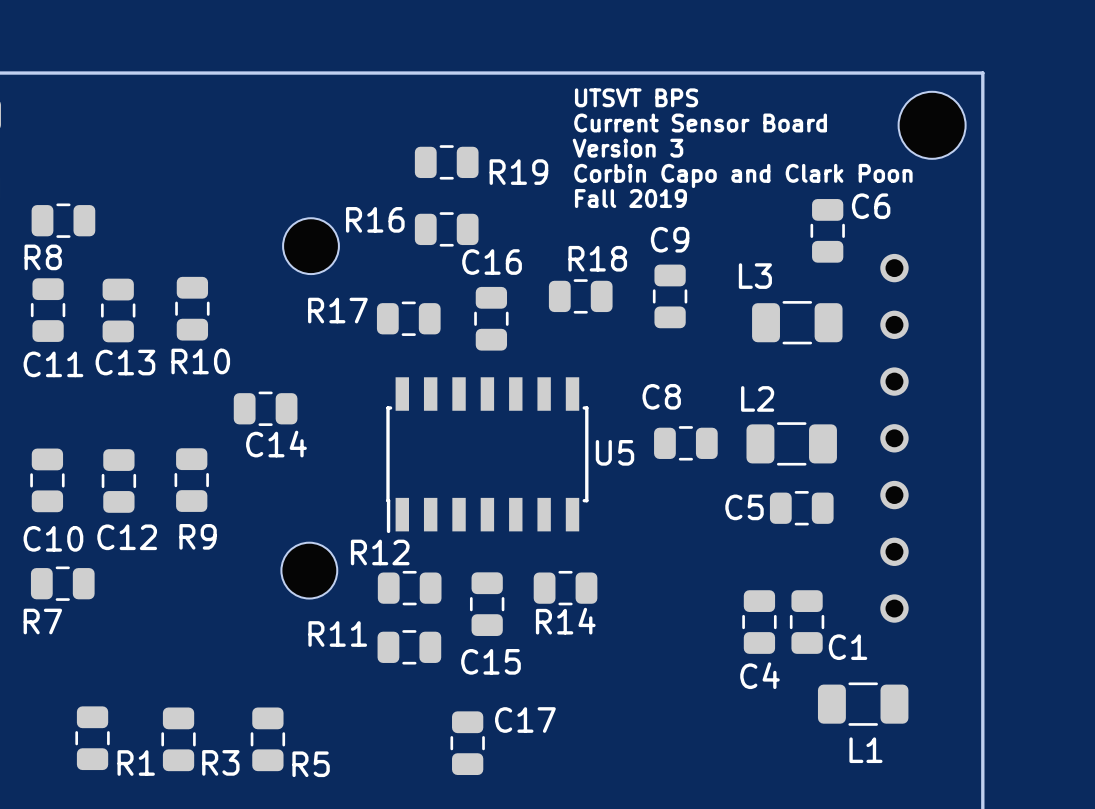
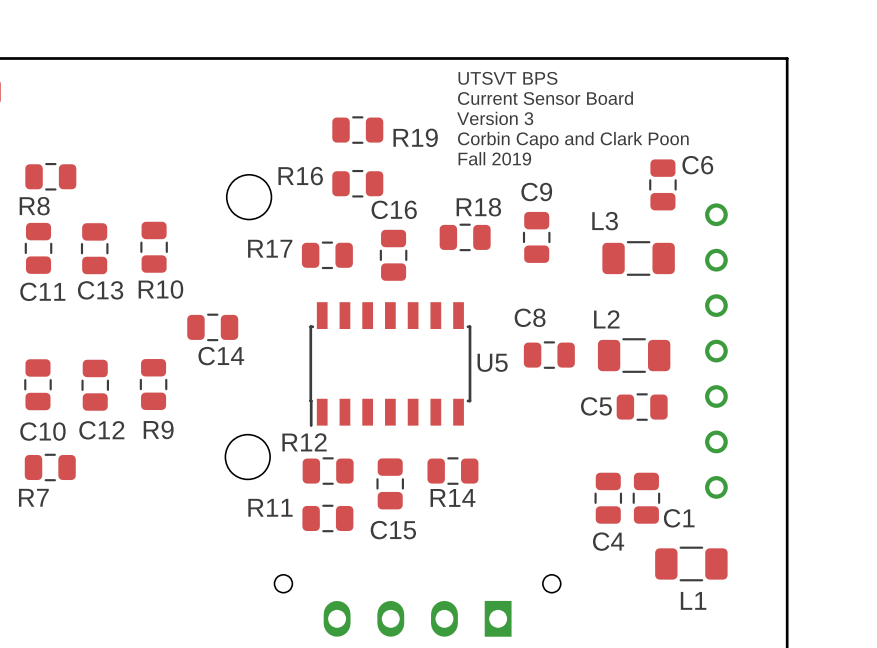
part: (932, 125) -> none
R1: (92, 738) -> none
R3: (178, 739) -> none
R5: (267, 739) -> none
C17: (467, 743) -> none
part: none -> (417, 605)

